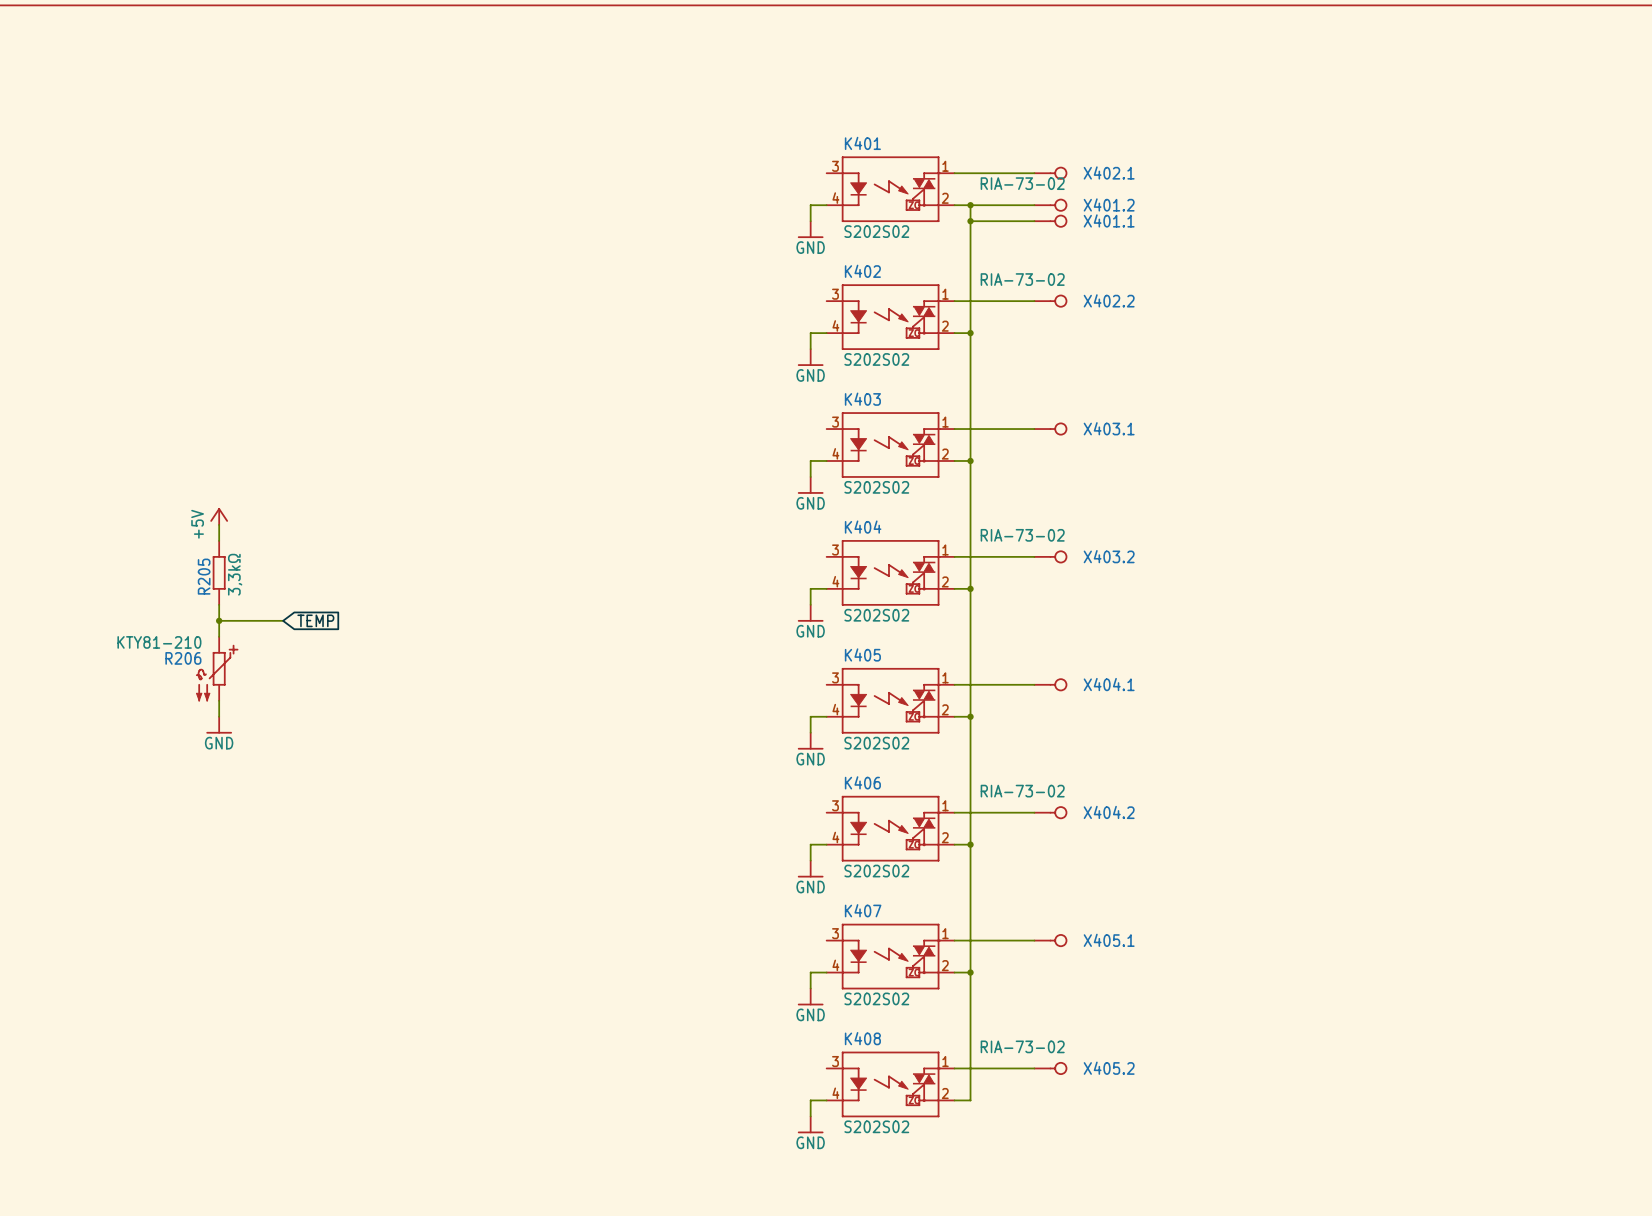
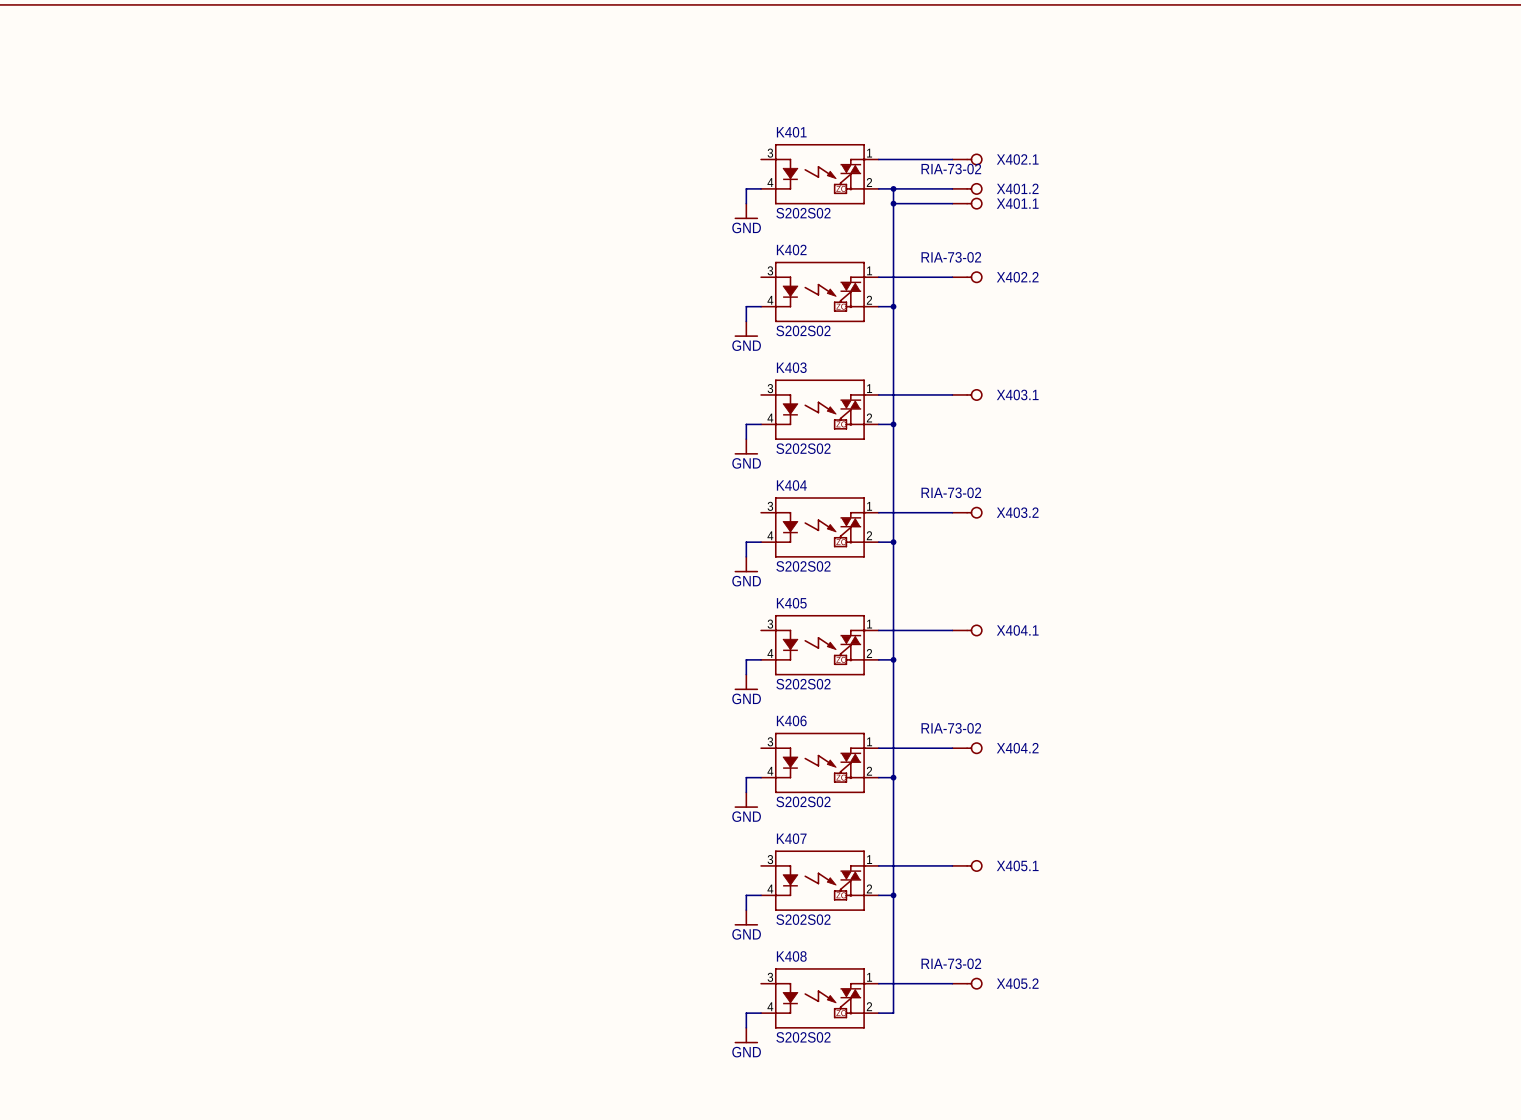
power symbol: +5V (219, 516) -> none
wire: (219, 524) (219, 540) -> none
R205: 3,3kΩ (219, 572) -> none
wire: (219, 604) (219, 636) -> none
wire: (219, 620) (283, 620) -> none
junction: (219, 620) -> none
global label: TEMP (315, 620) -> none
R206: KTY81-210 (217, 669) -> none
wire: (219, 700) (219, 716) -> none
power symbol: GND (219, 725) -> none

